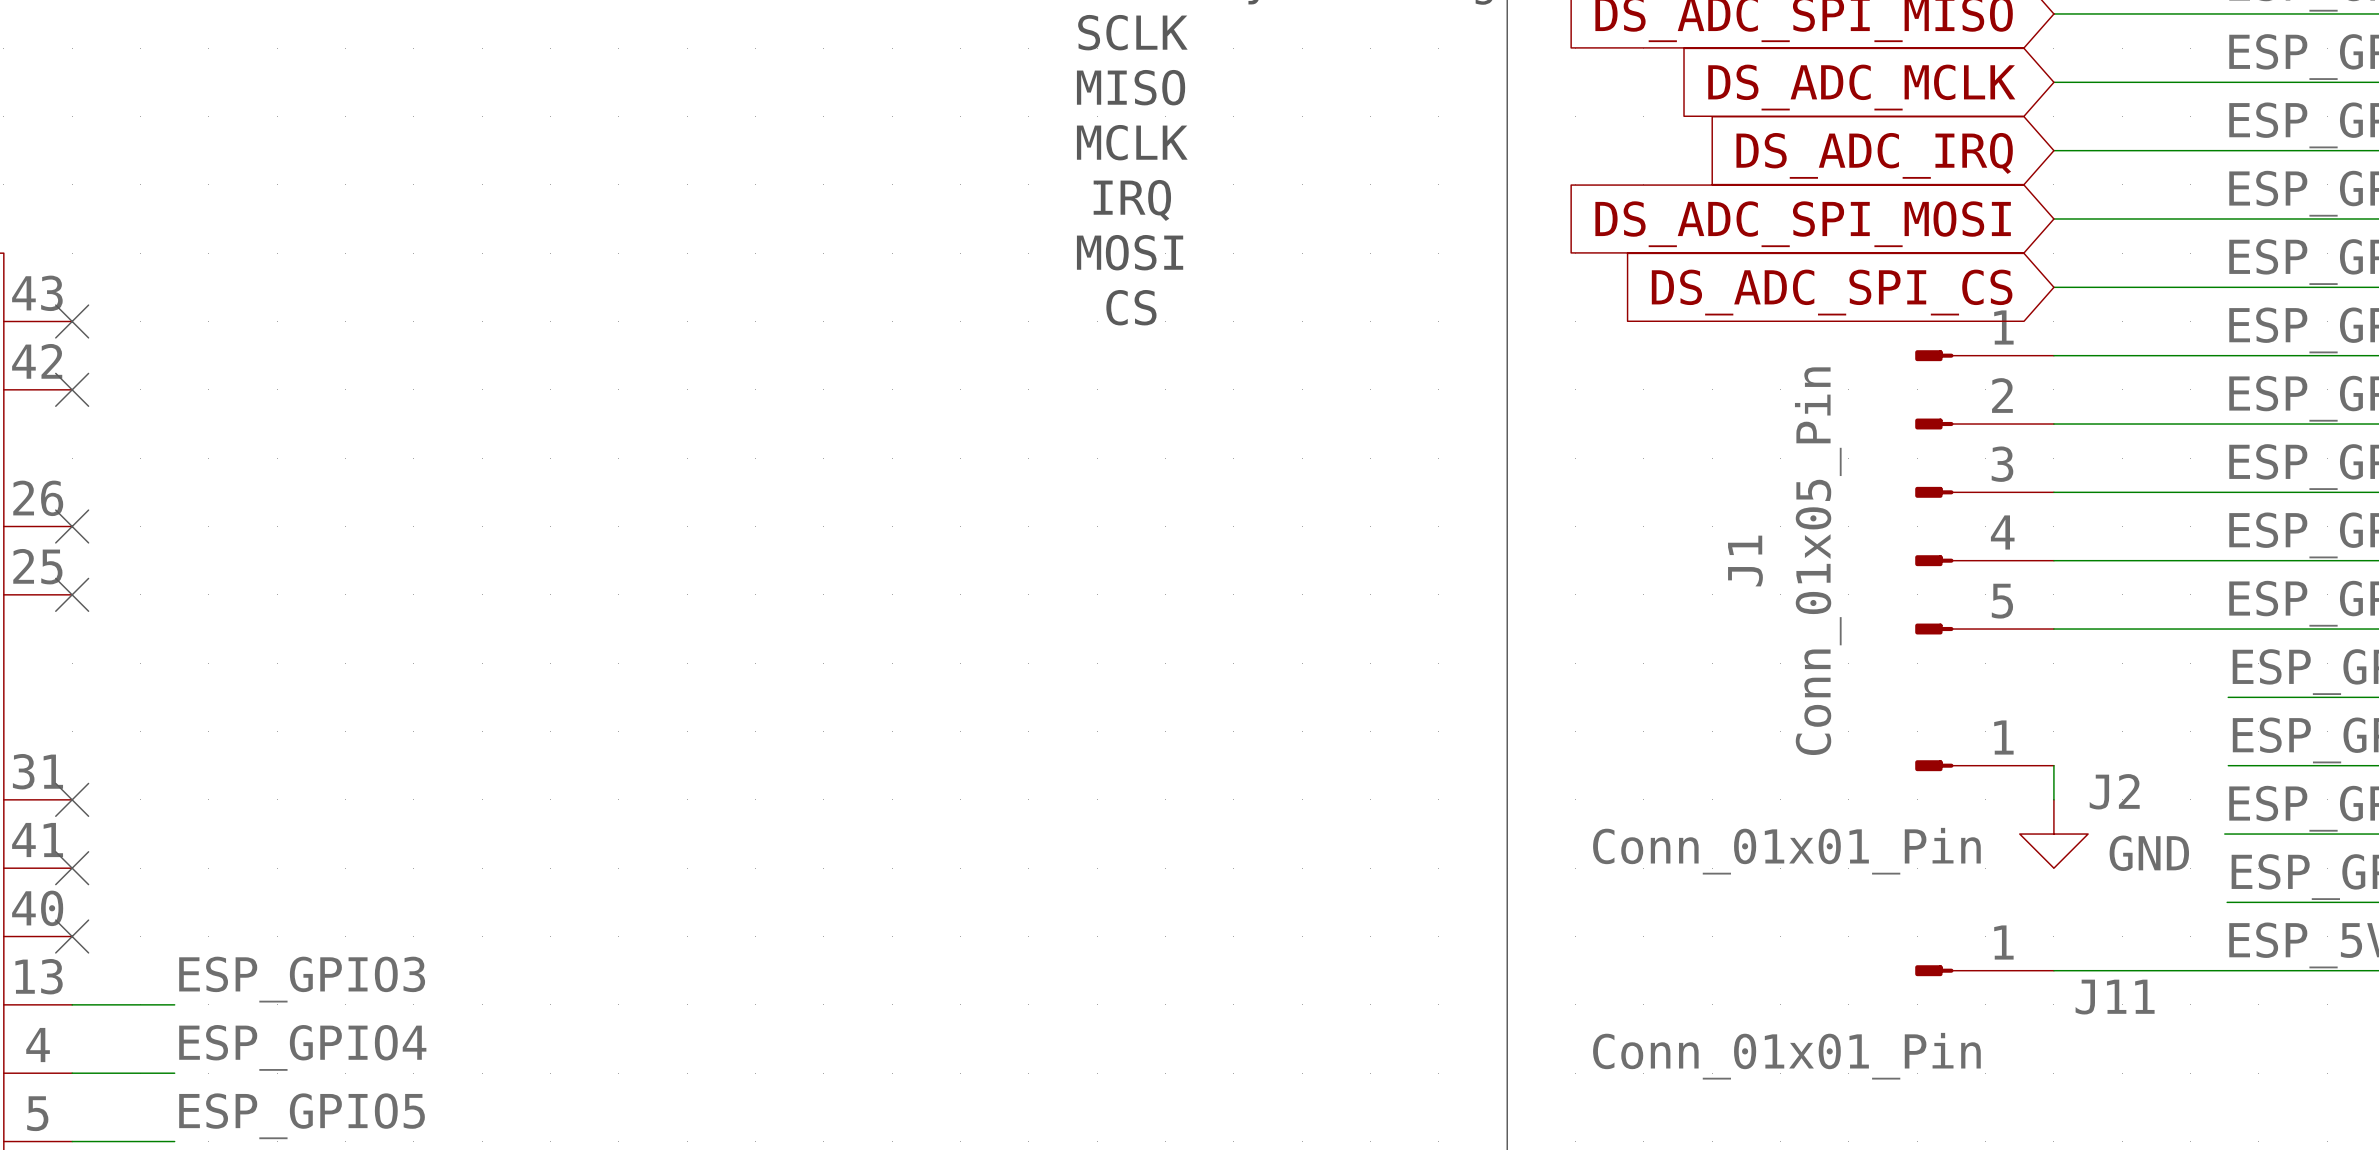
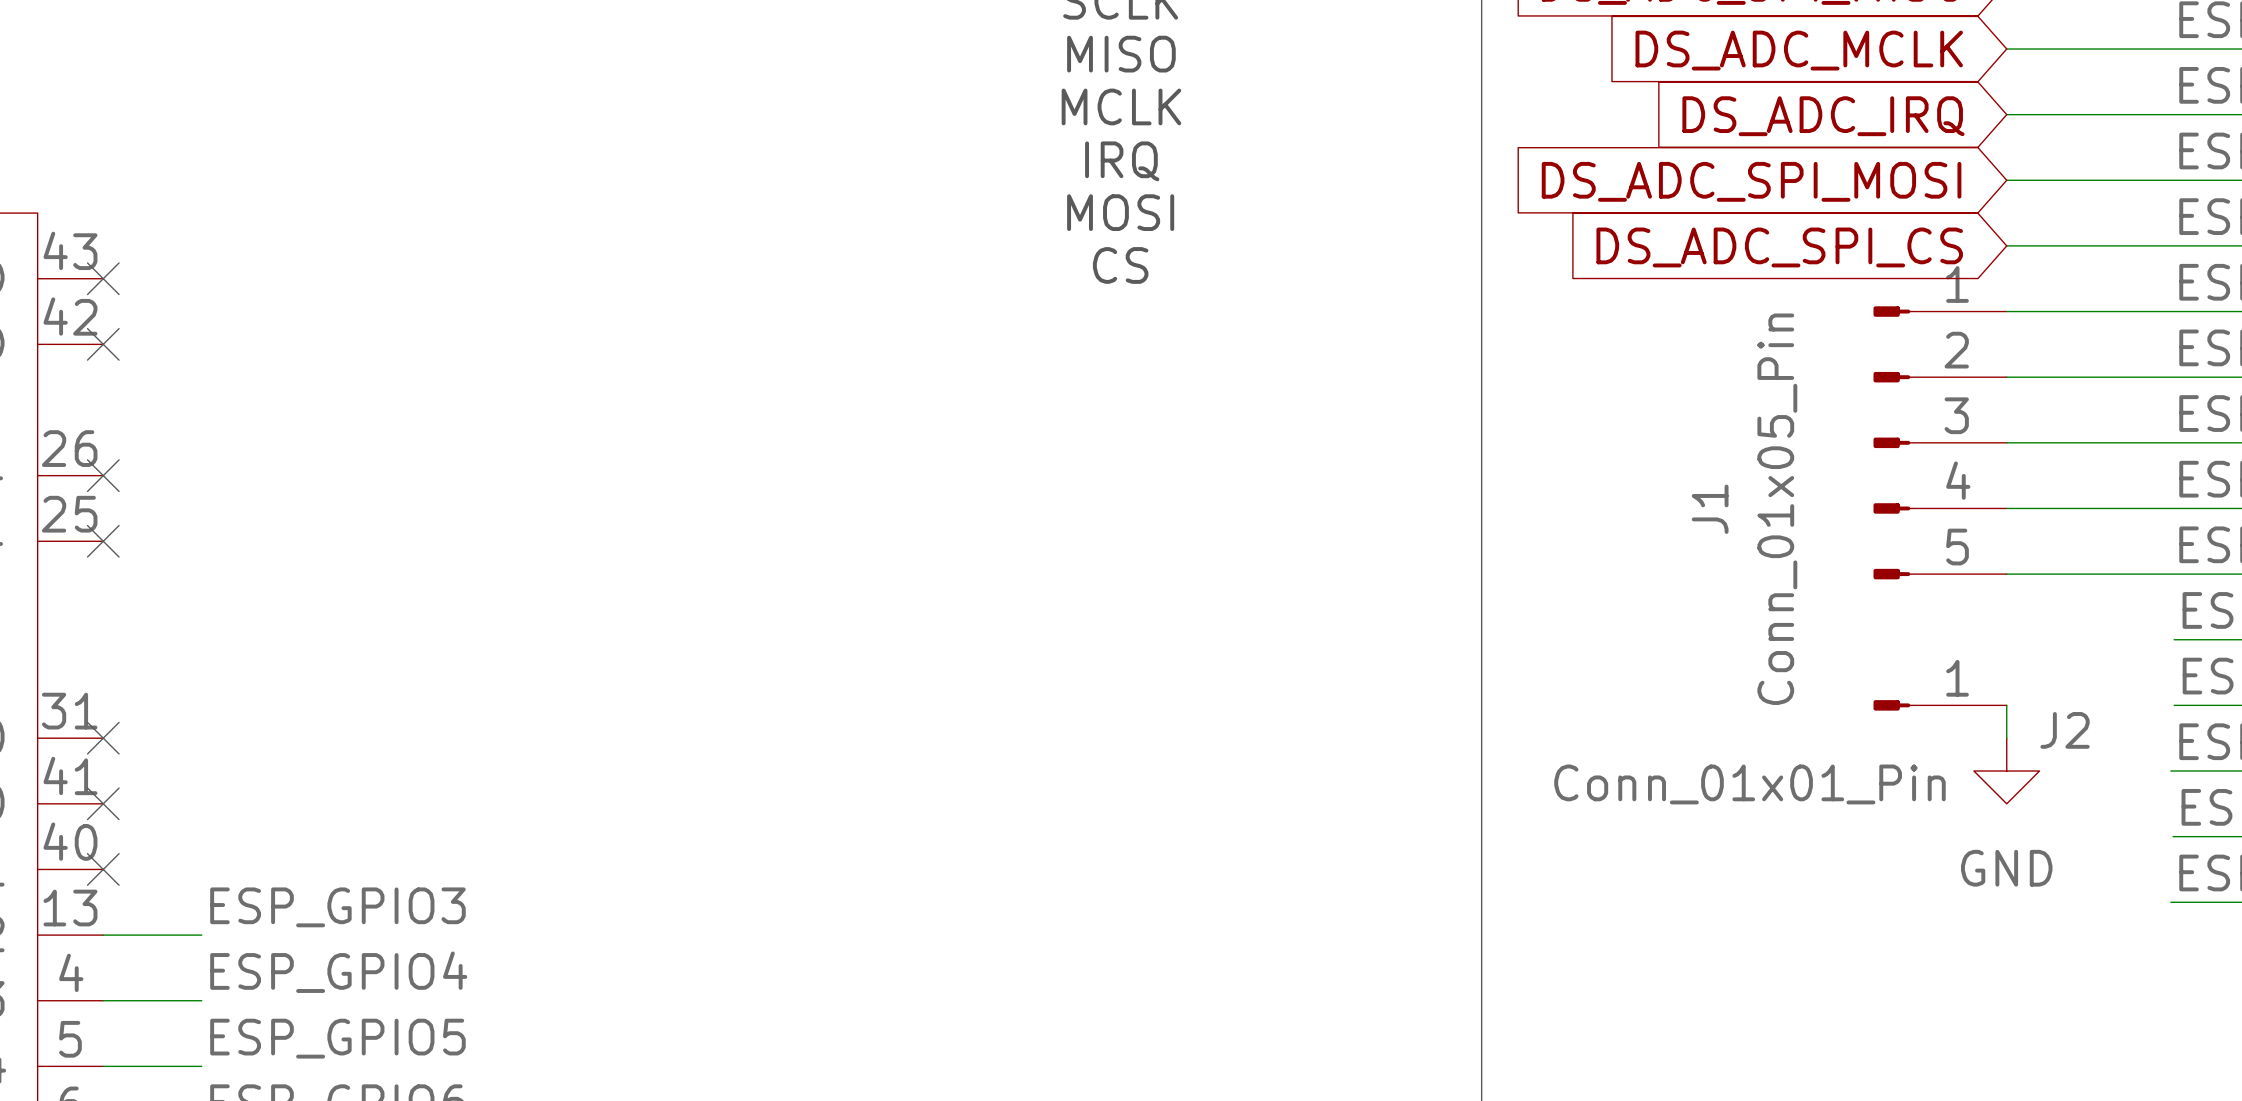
power symbol text position: GND (2149, 853) -> GND (2006, 868)
J11: Conn_01x01_Pin (1984, 970) -> none
wire: (2053, 970) (2224, 970) -> none

